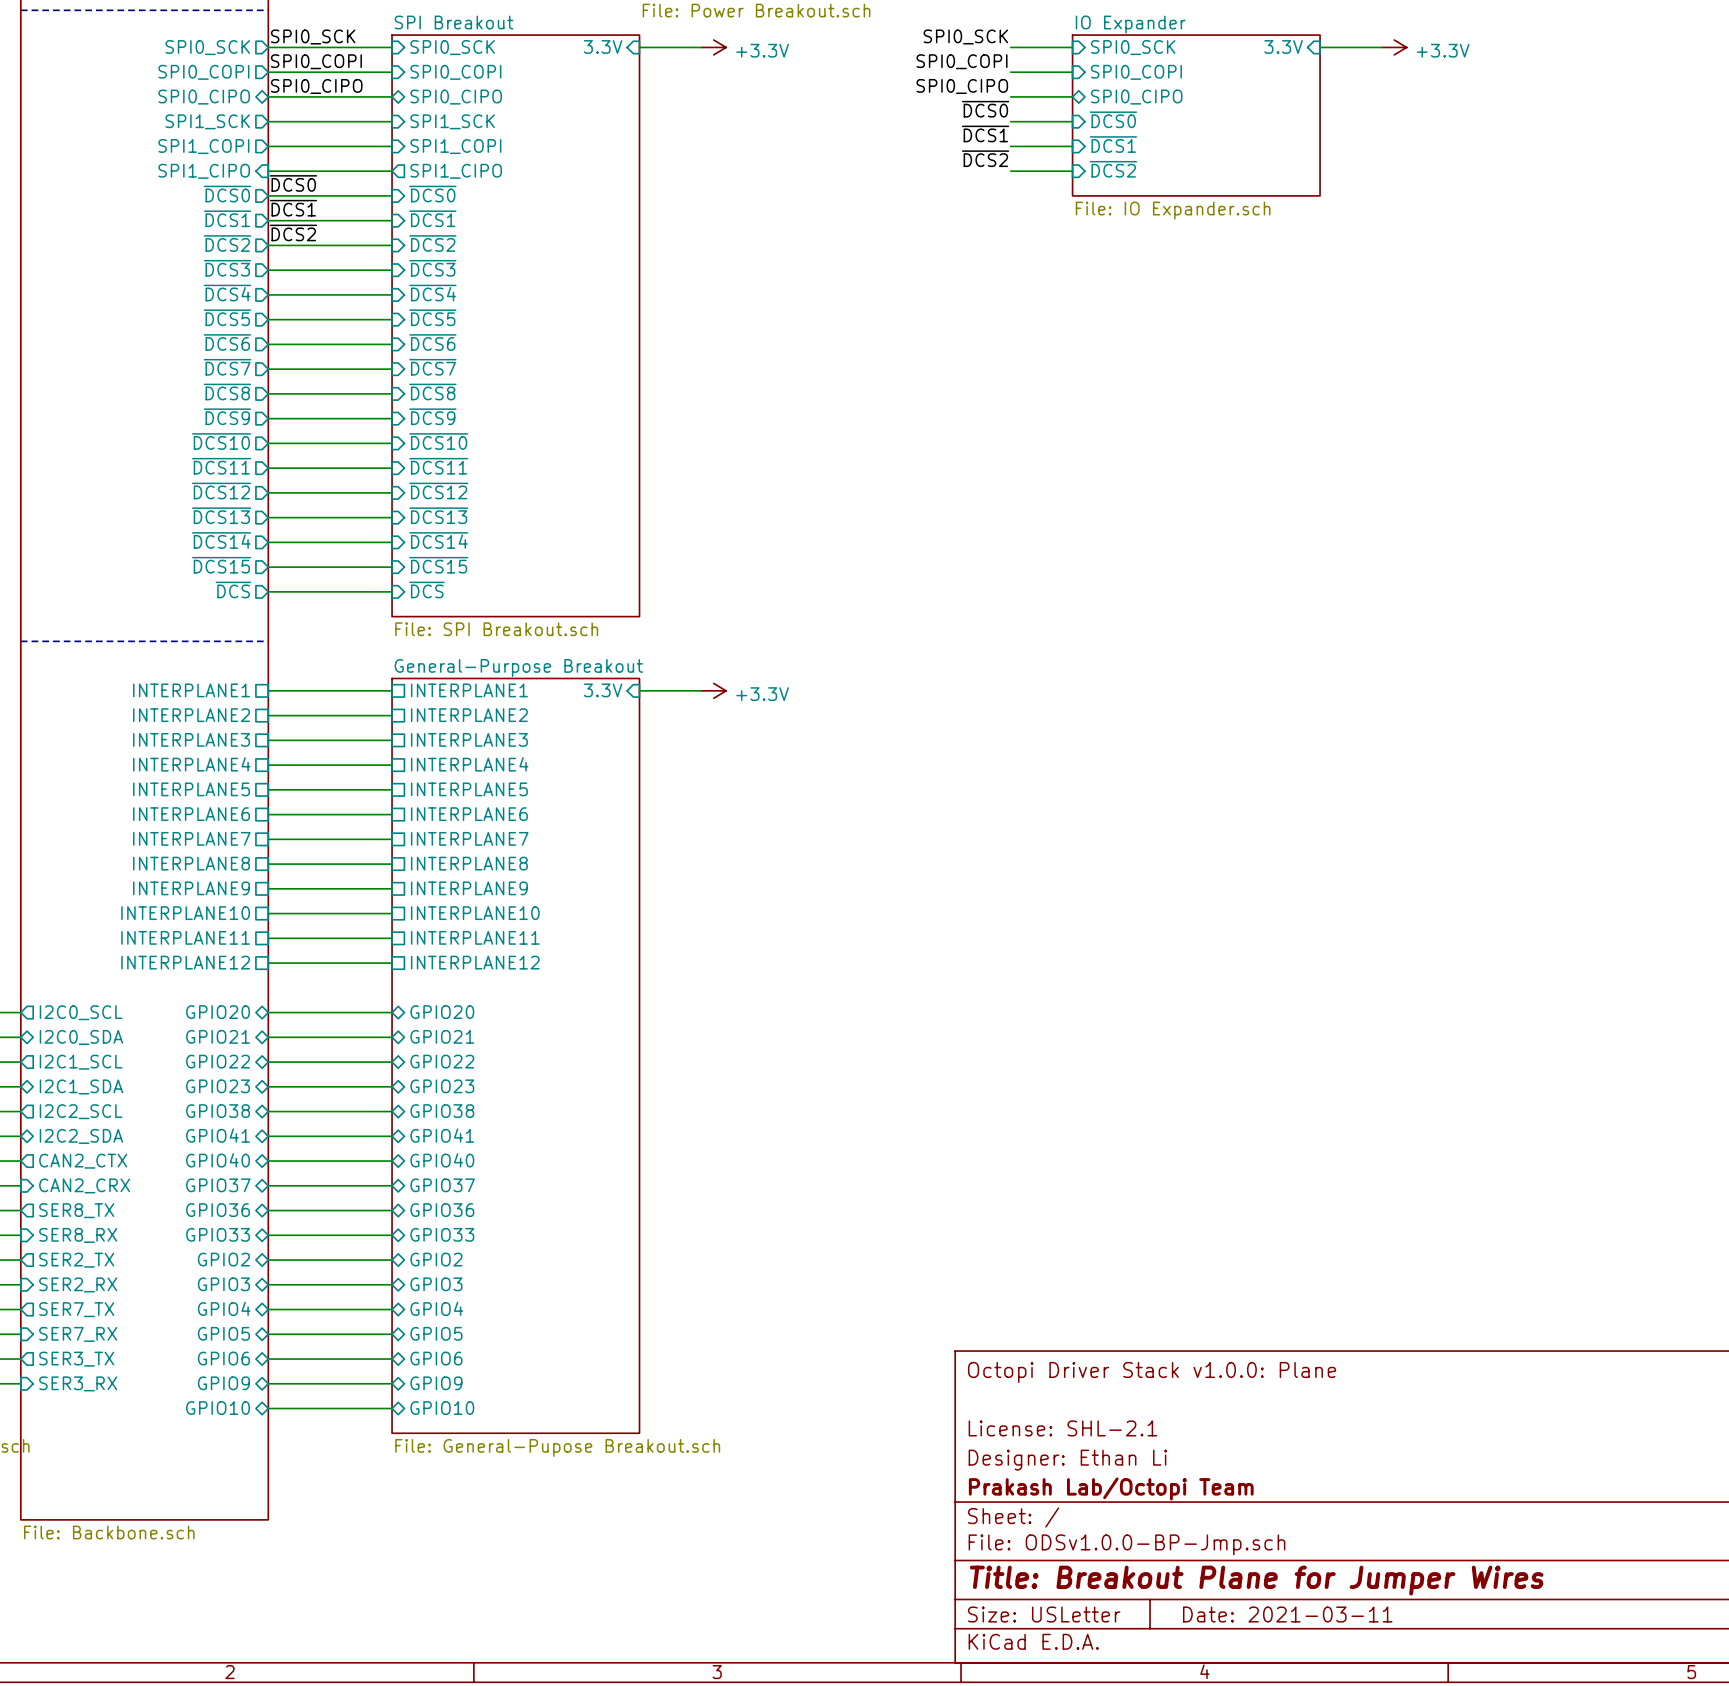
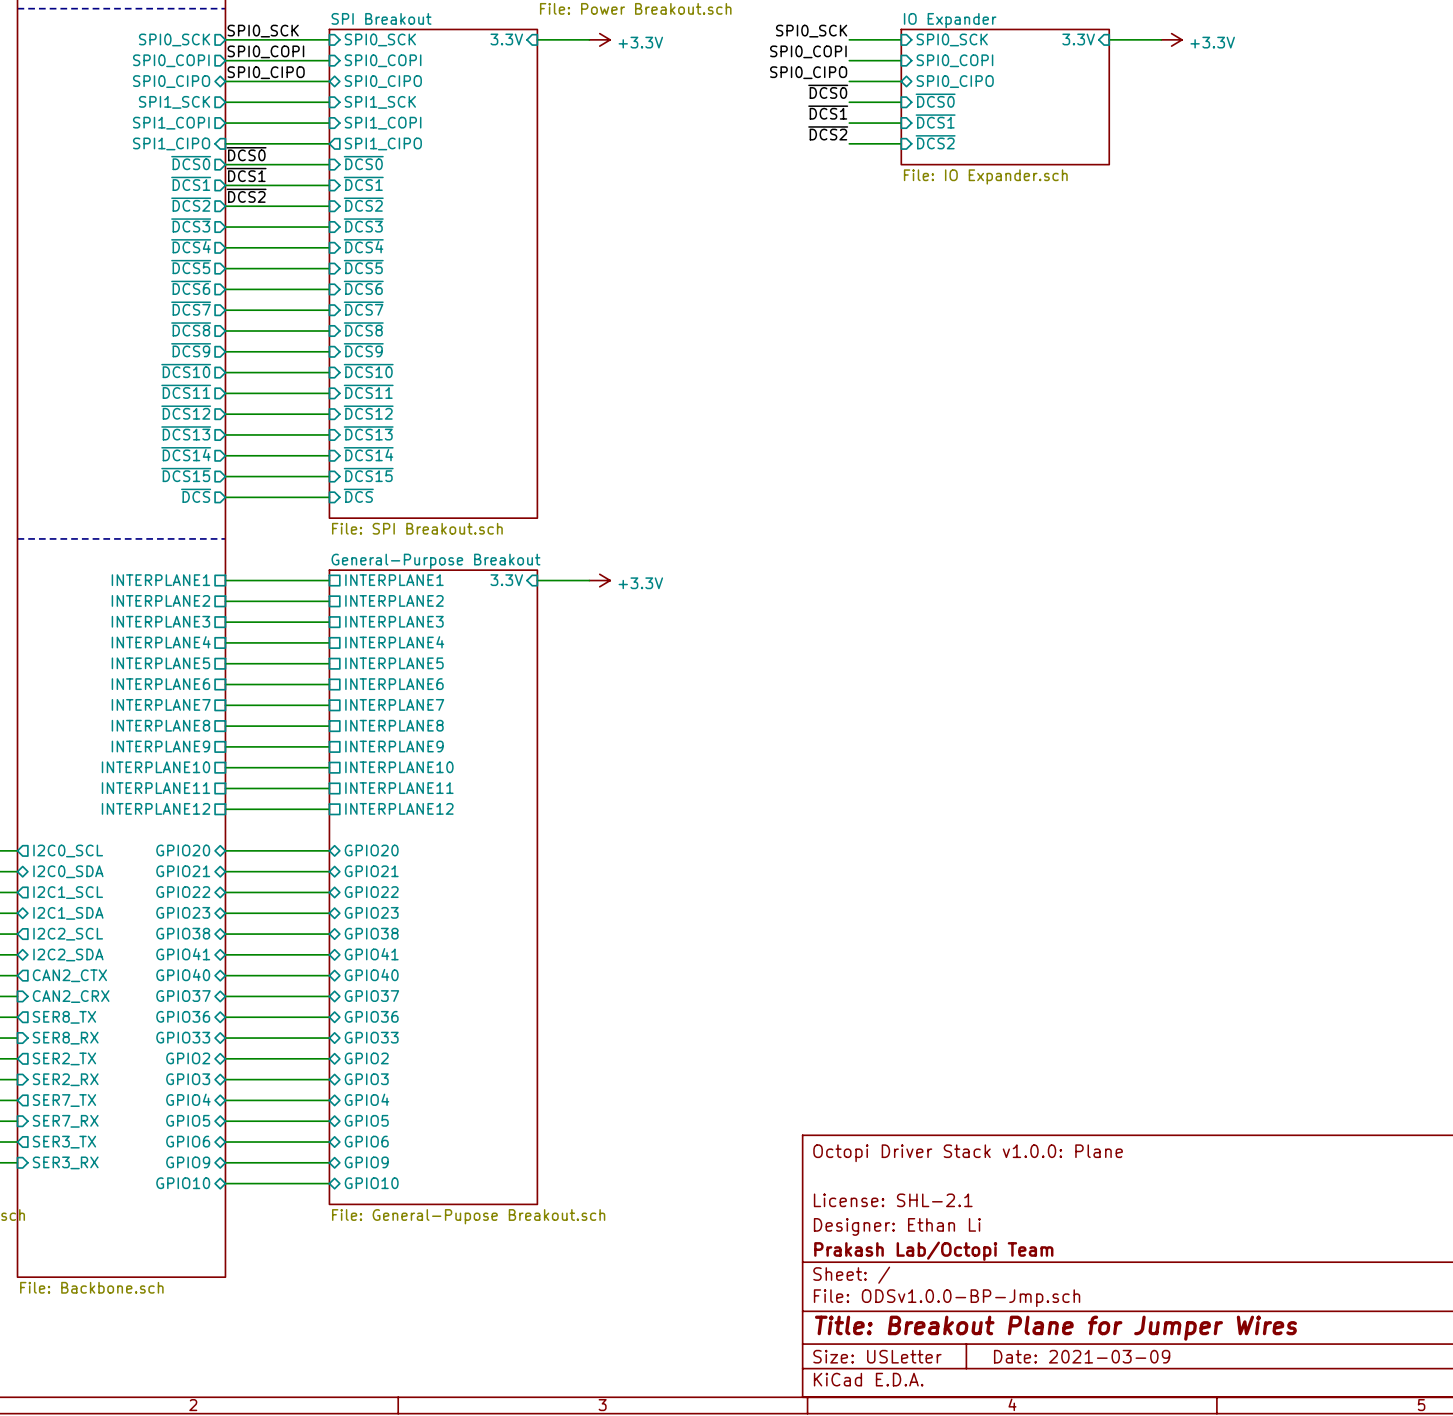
title block: Date: 2021-03-11 (1287, 1614) -> Date: 2021-03-09 (1082, 1356)

